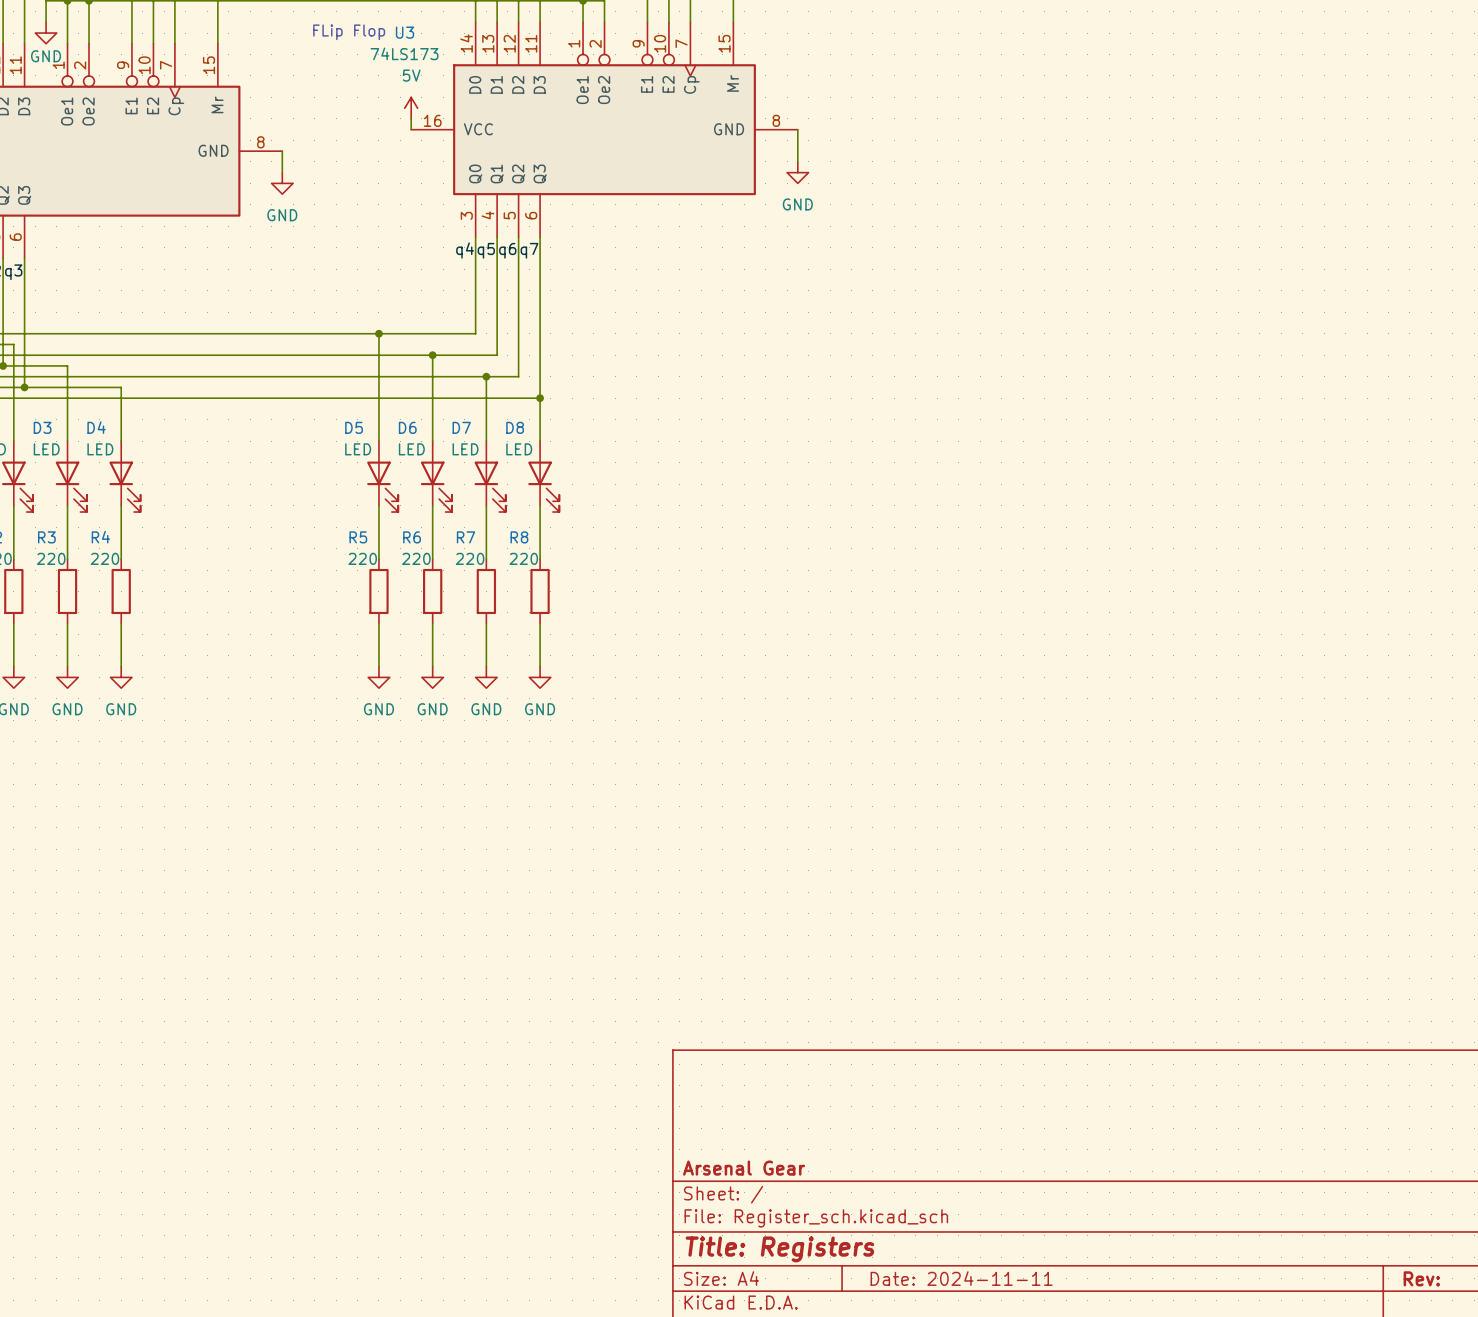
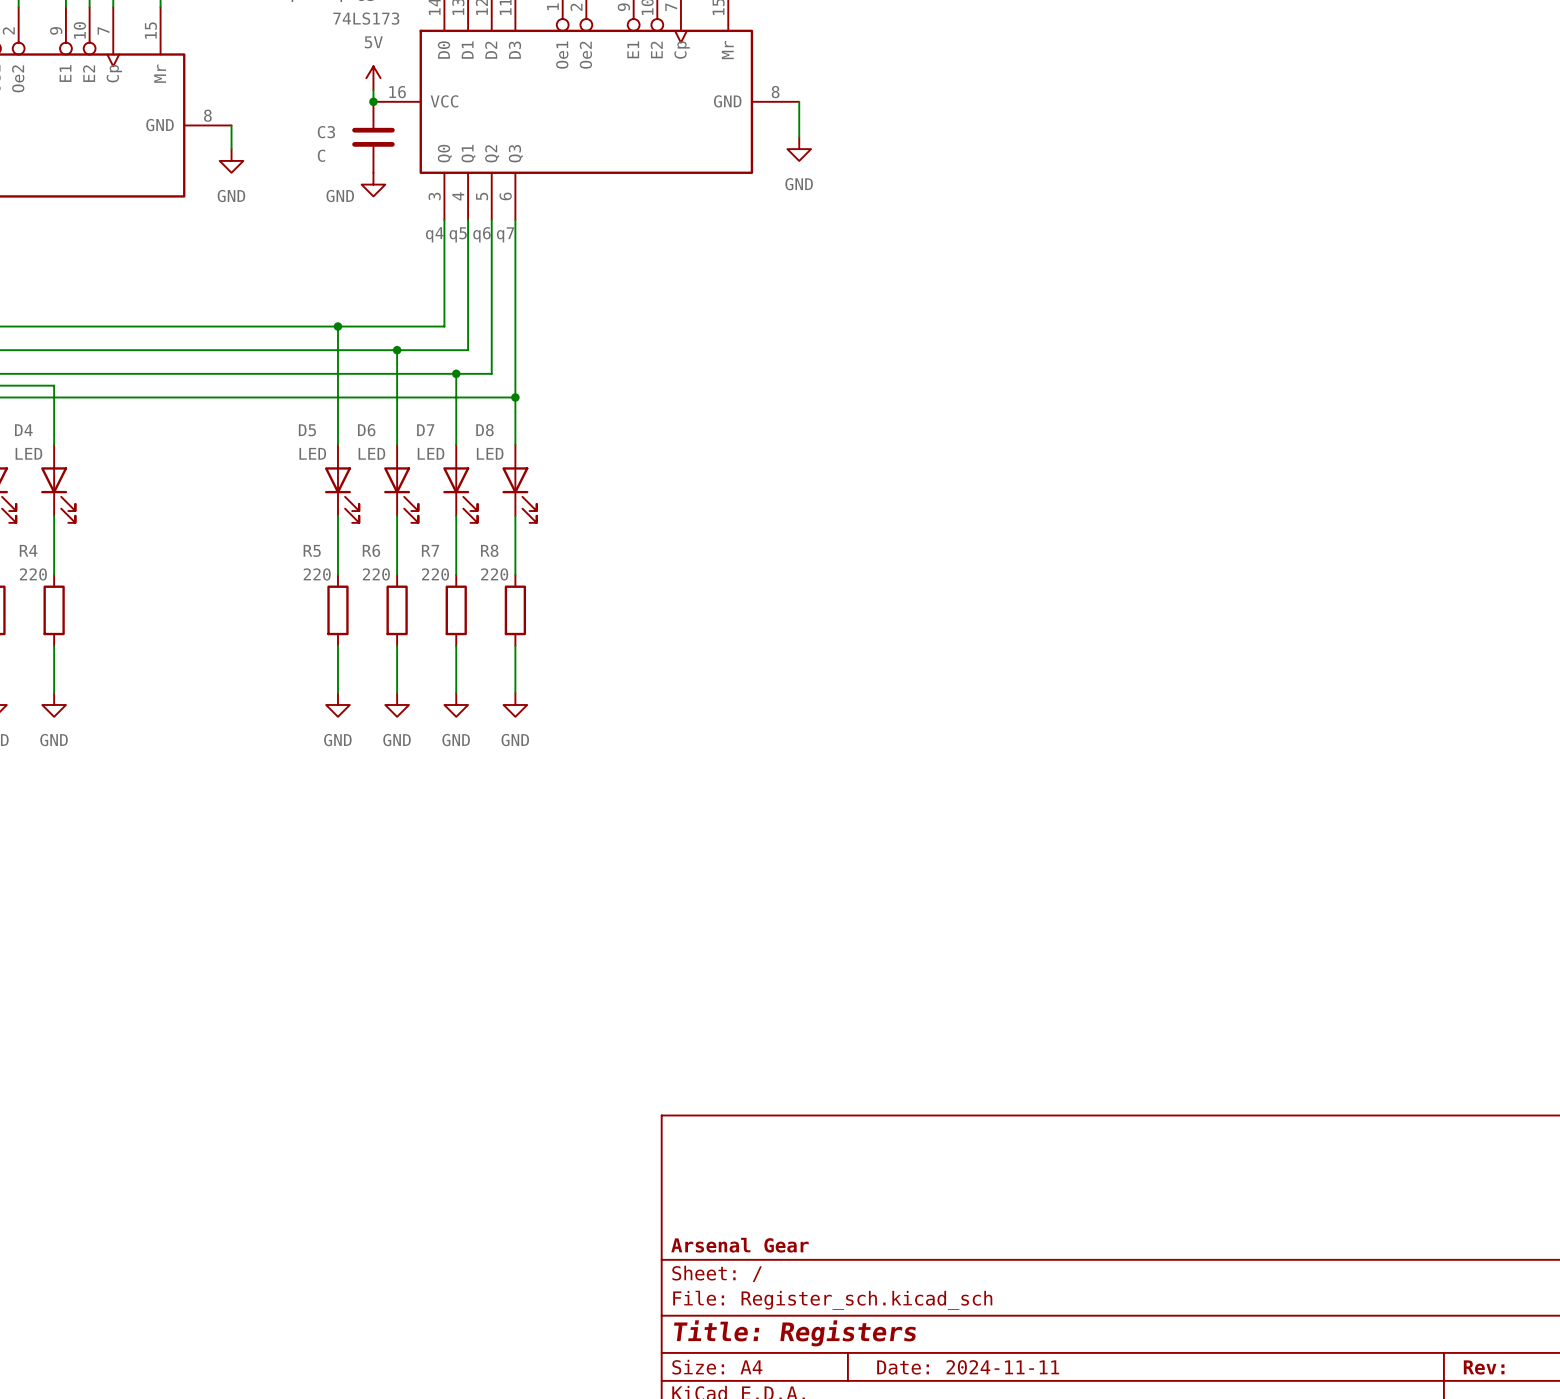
junction: none -> (373, 101)
C3: none -> C (373, 137)
power symbol: none -> GND (373, 184)

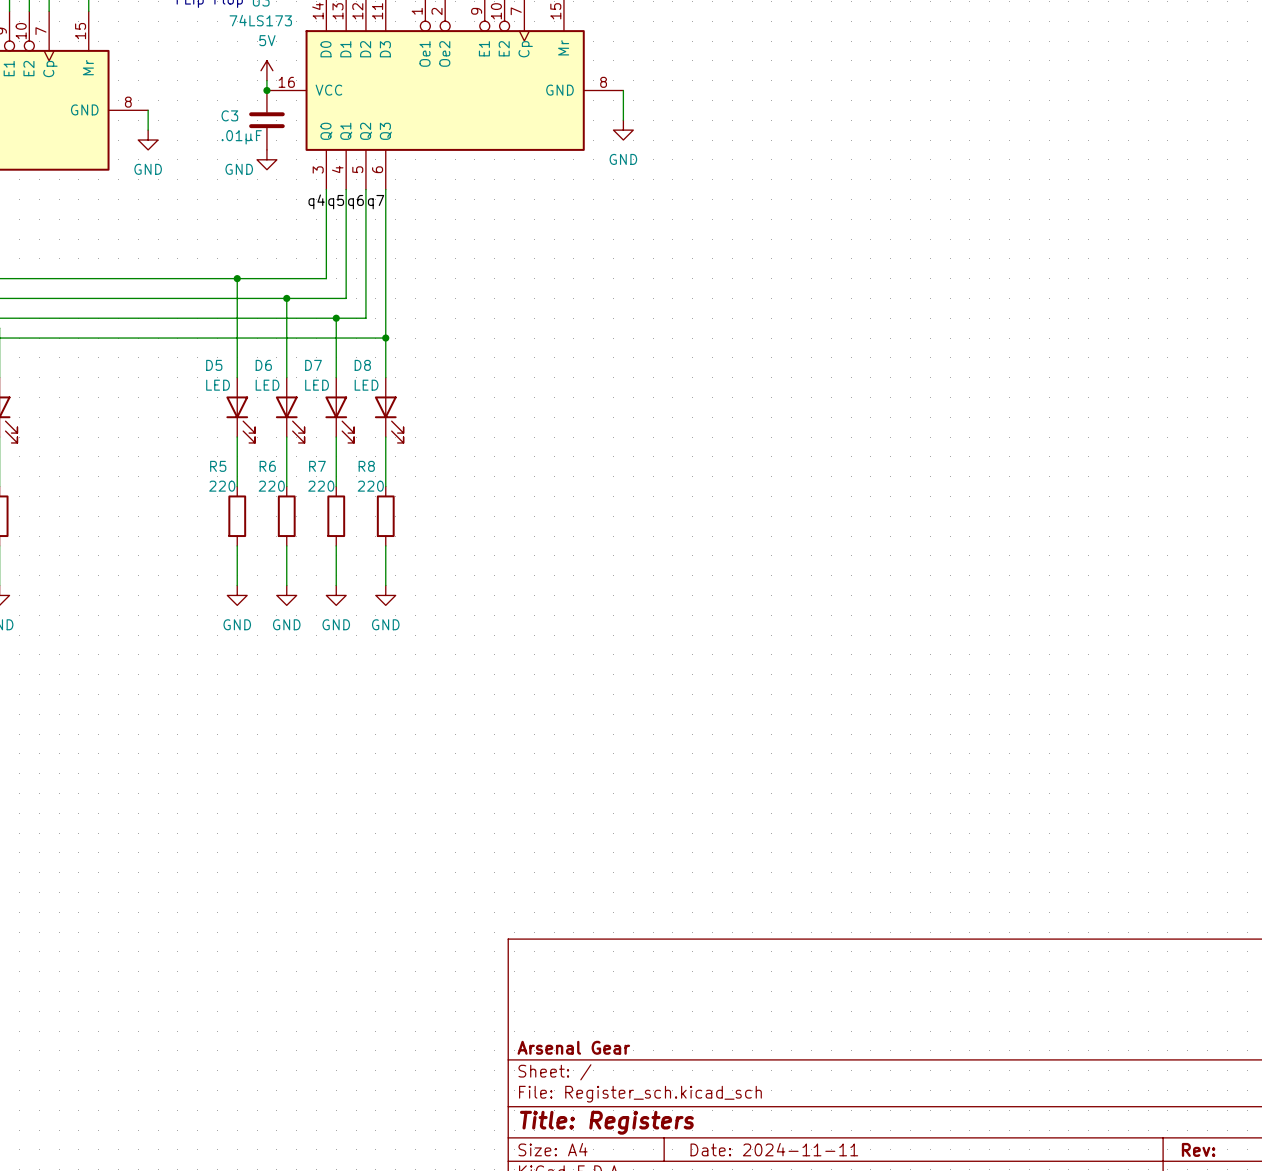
C3 value: C (321, 155) -> .01µF (241, 137)

